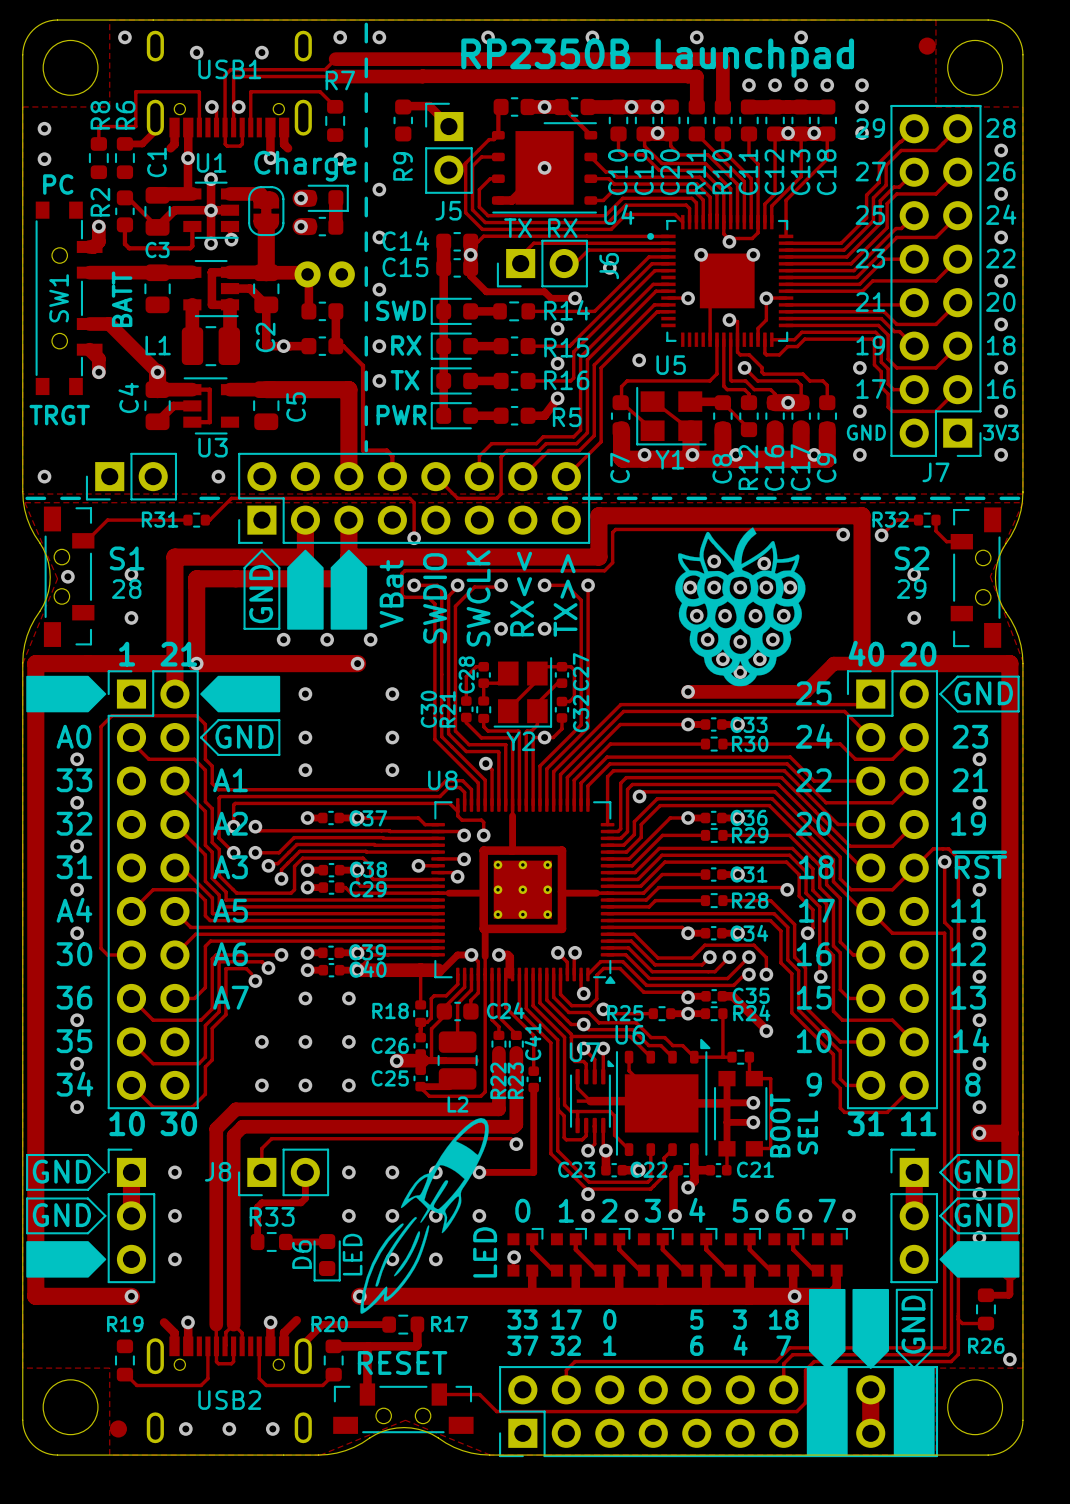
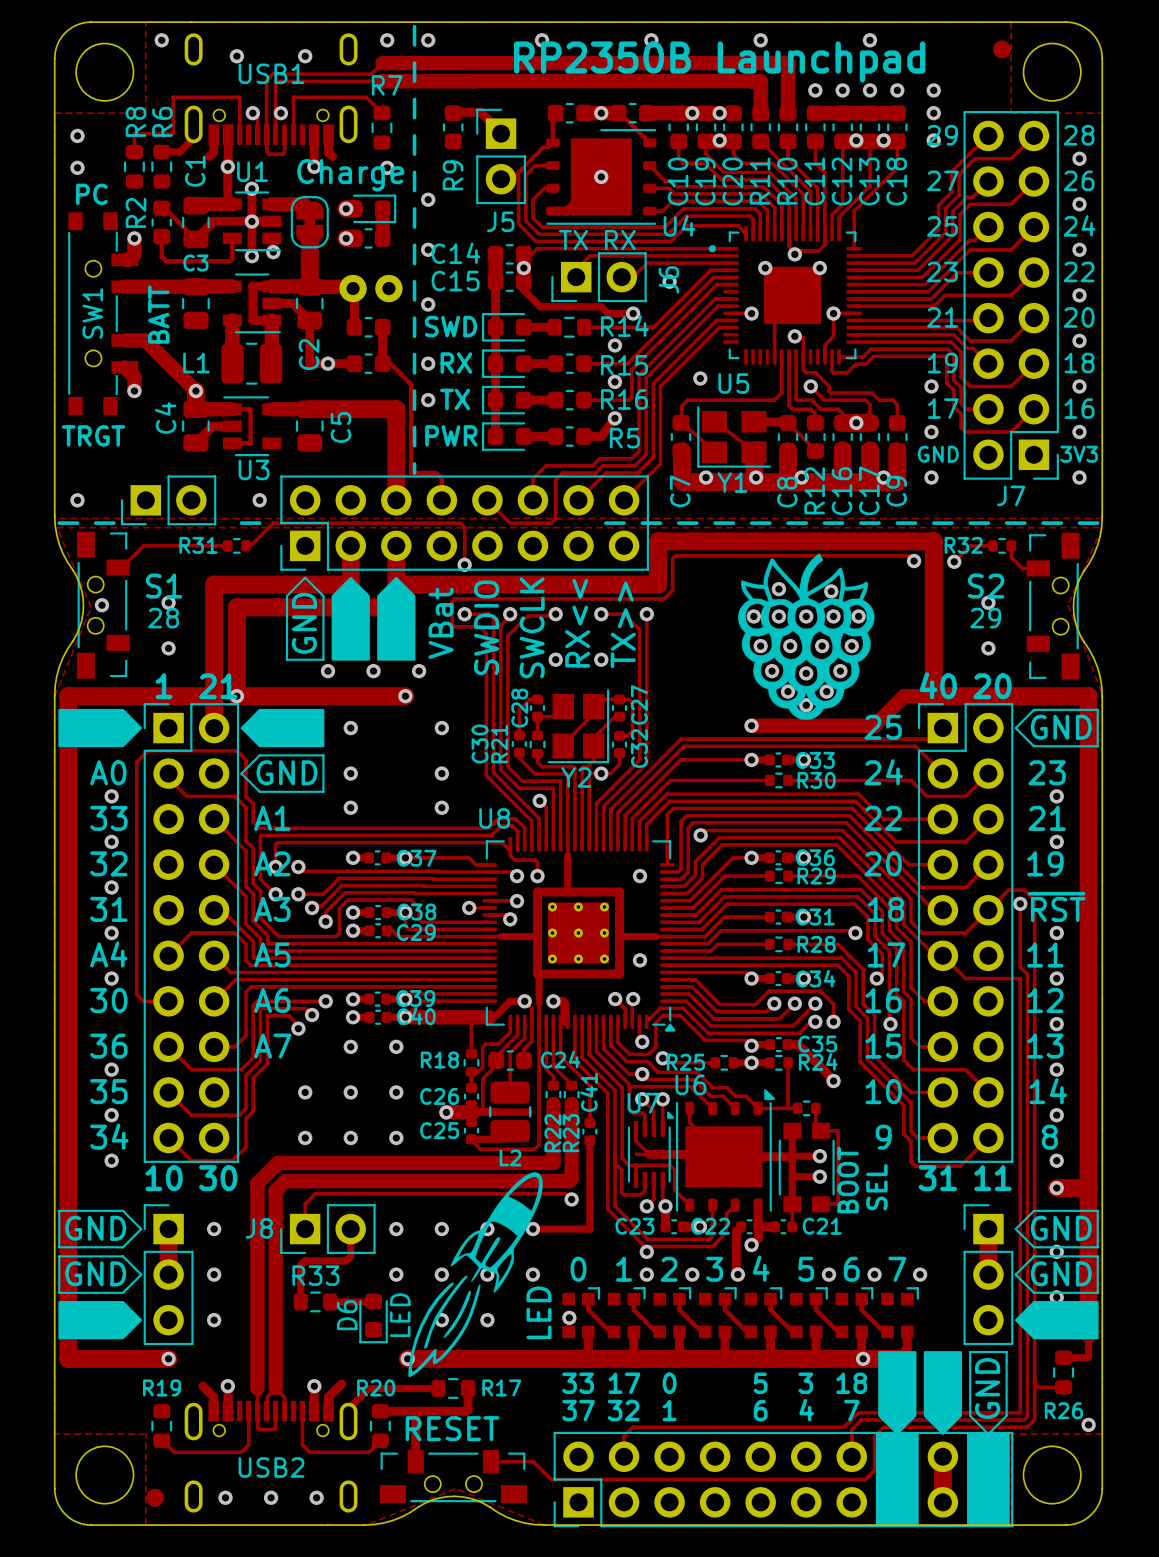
via: none -> (639, 876)
via: none -> (639, 960)

